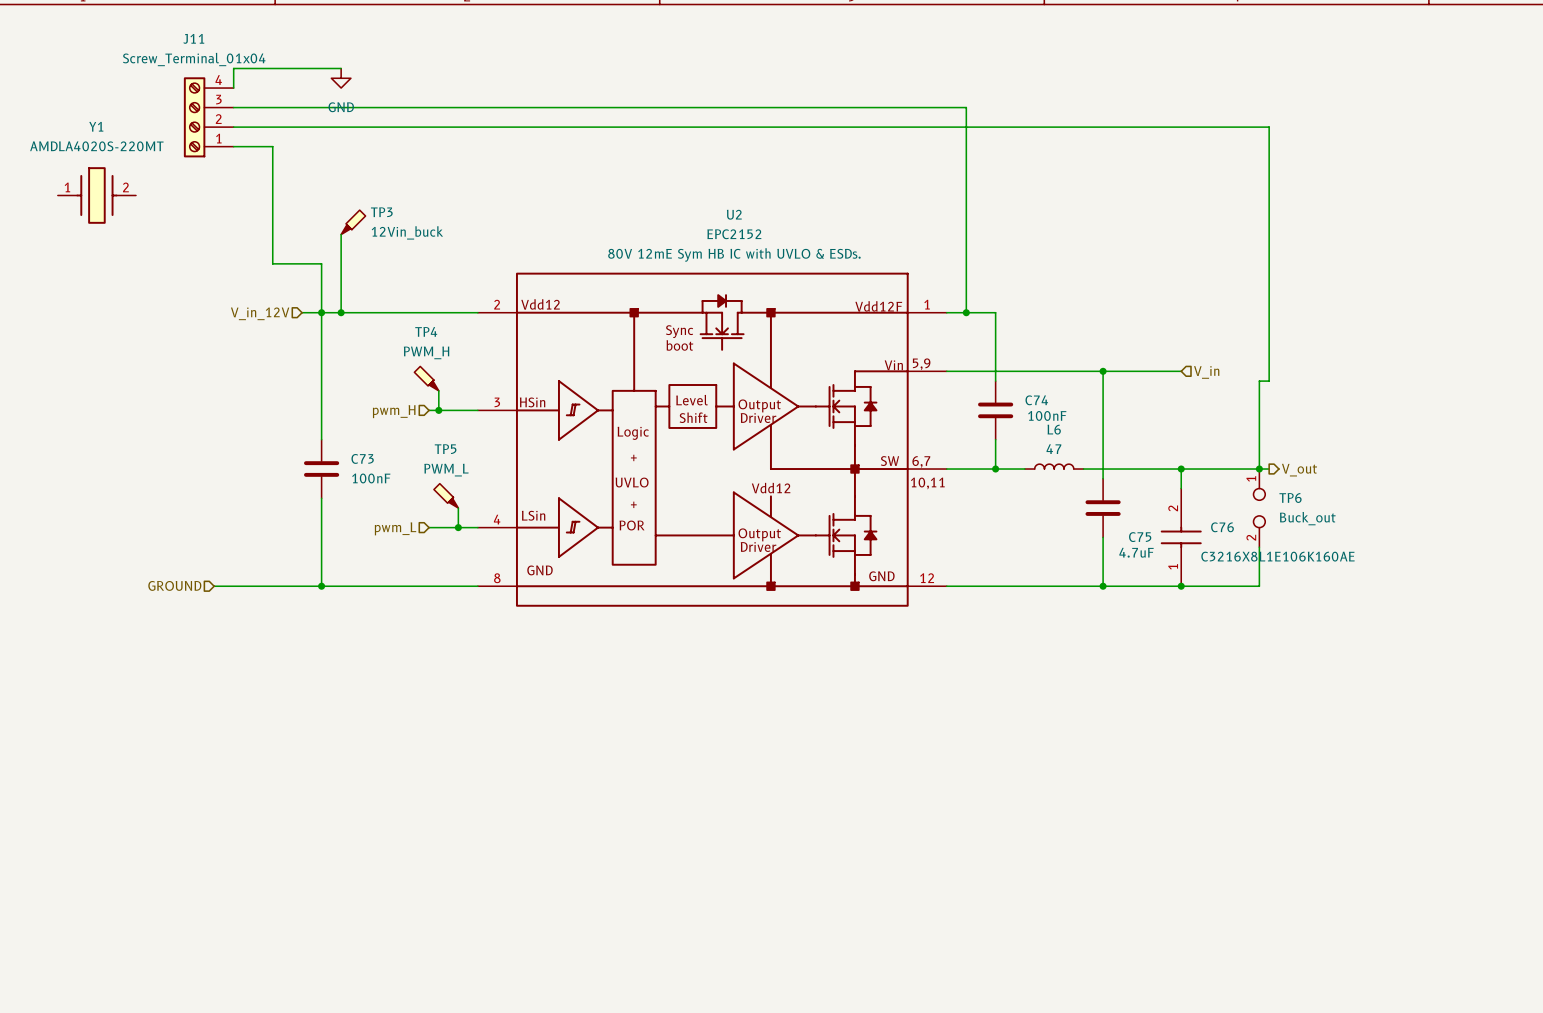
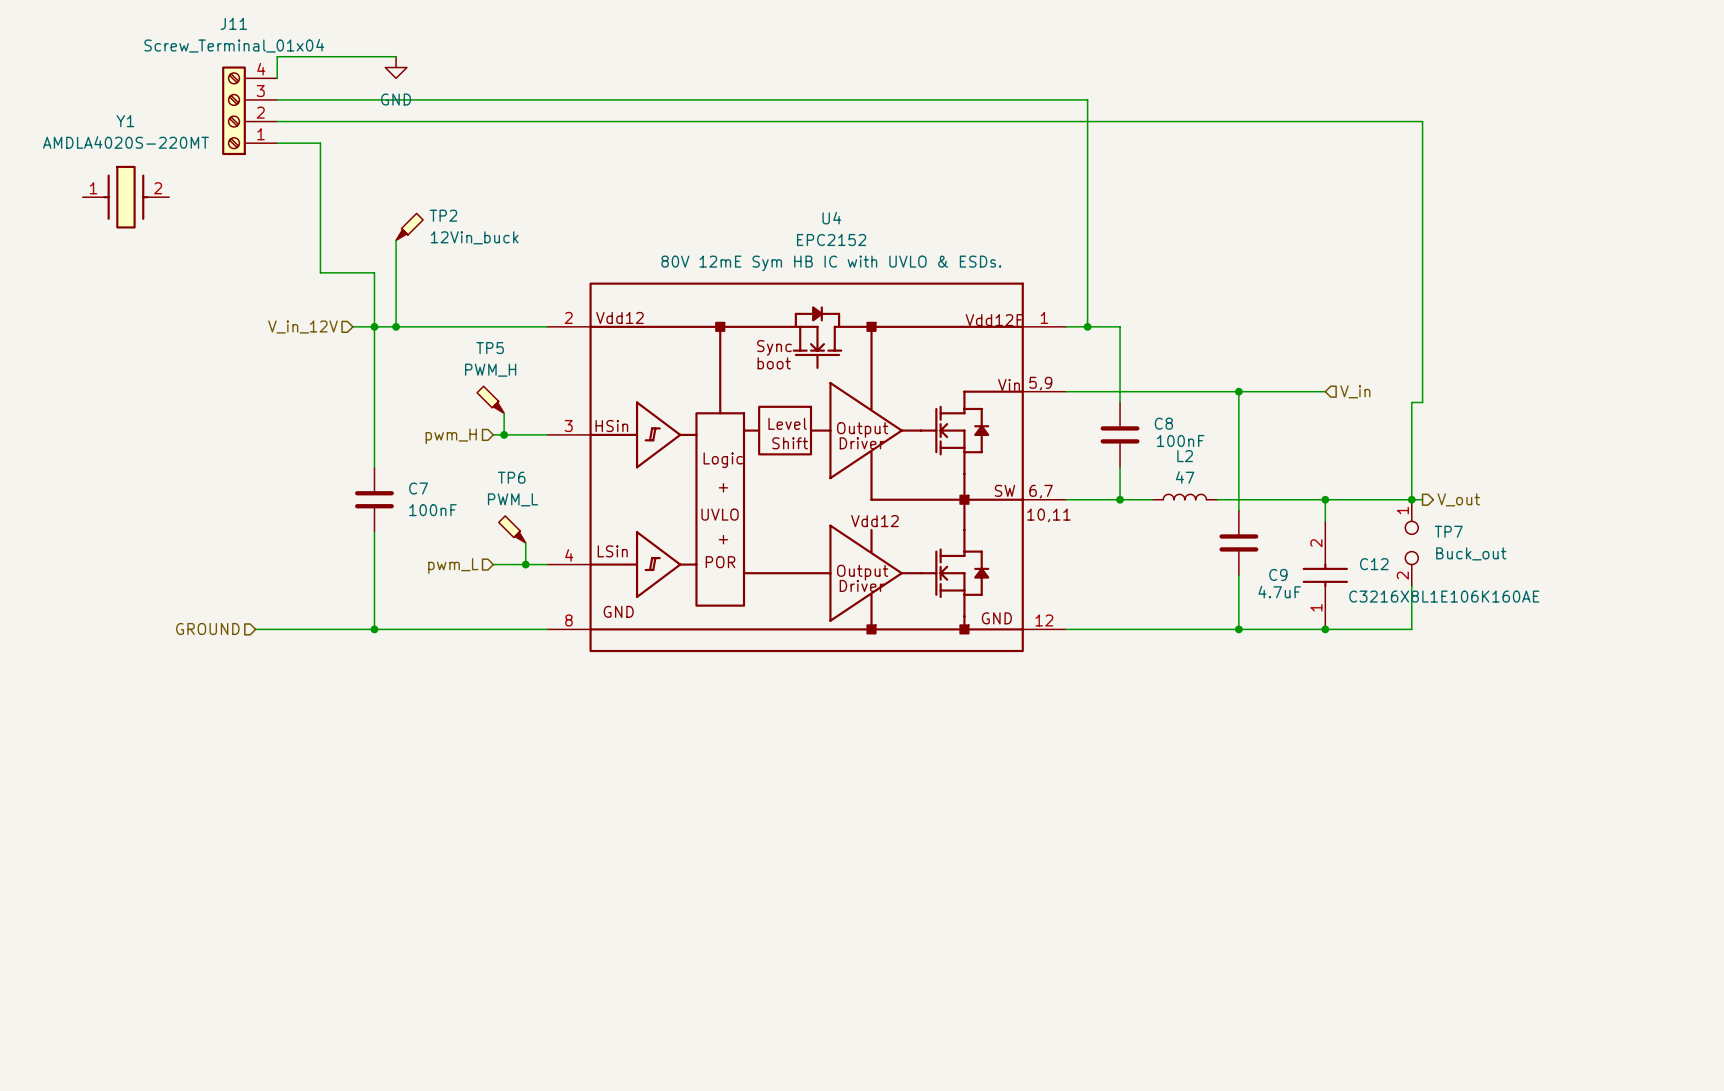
TP3 name: TP3 (381, 212) -> TP2 (443, 215)
U2 name: U2 (734, 214) -> U4 (831, 218)
TP4 name: TP4 (426, 331) -> TP5 (490, 348)
C74 name: C74 (1036, 400) -> C8 (1163, 423)
L6 name: L6 (1054, 429) -> L2 (1185, 456)
TP5 name: TP5 (445, 449) -> TP6 (511, 477)
C73 name: C73 (362, 458) -> C7 (418, 488)
TP6 name: TP6 (1290, 498) -> TP7 (1448, 531)
C76 name: C76 (1222, 527) -> C12 (1374, 564)
C75 name: C75 (1140, 537) -> C9 (1278, 574)

